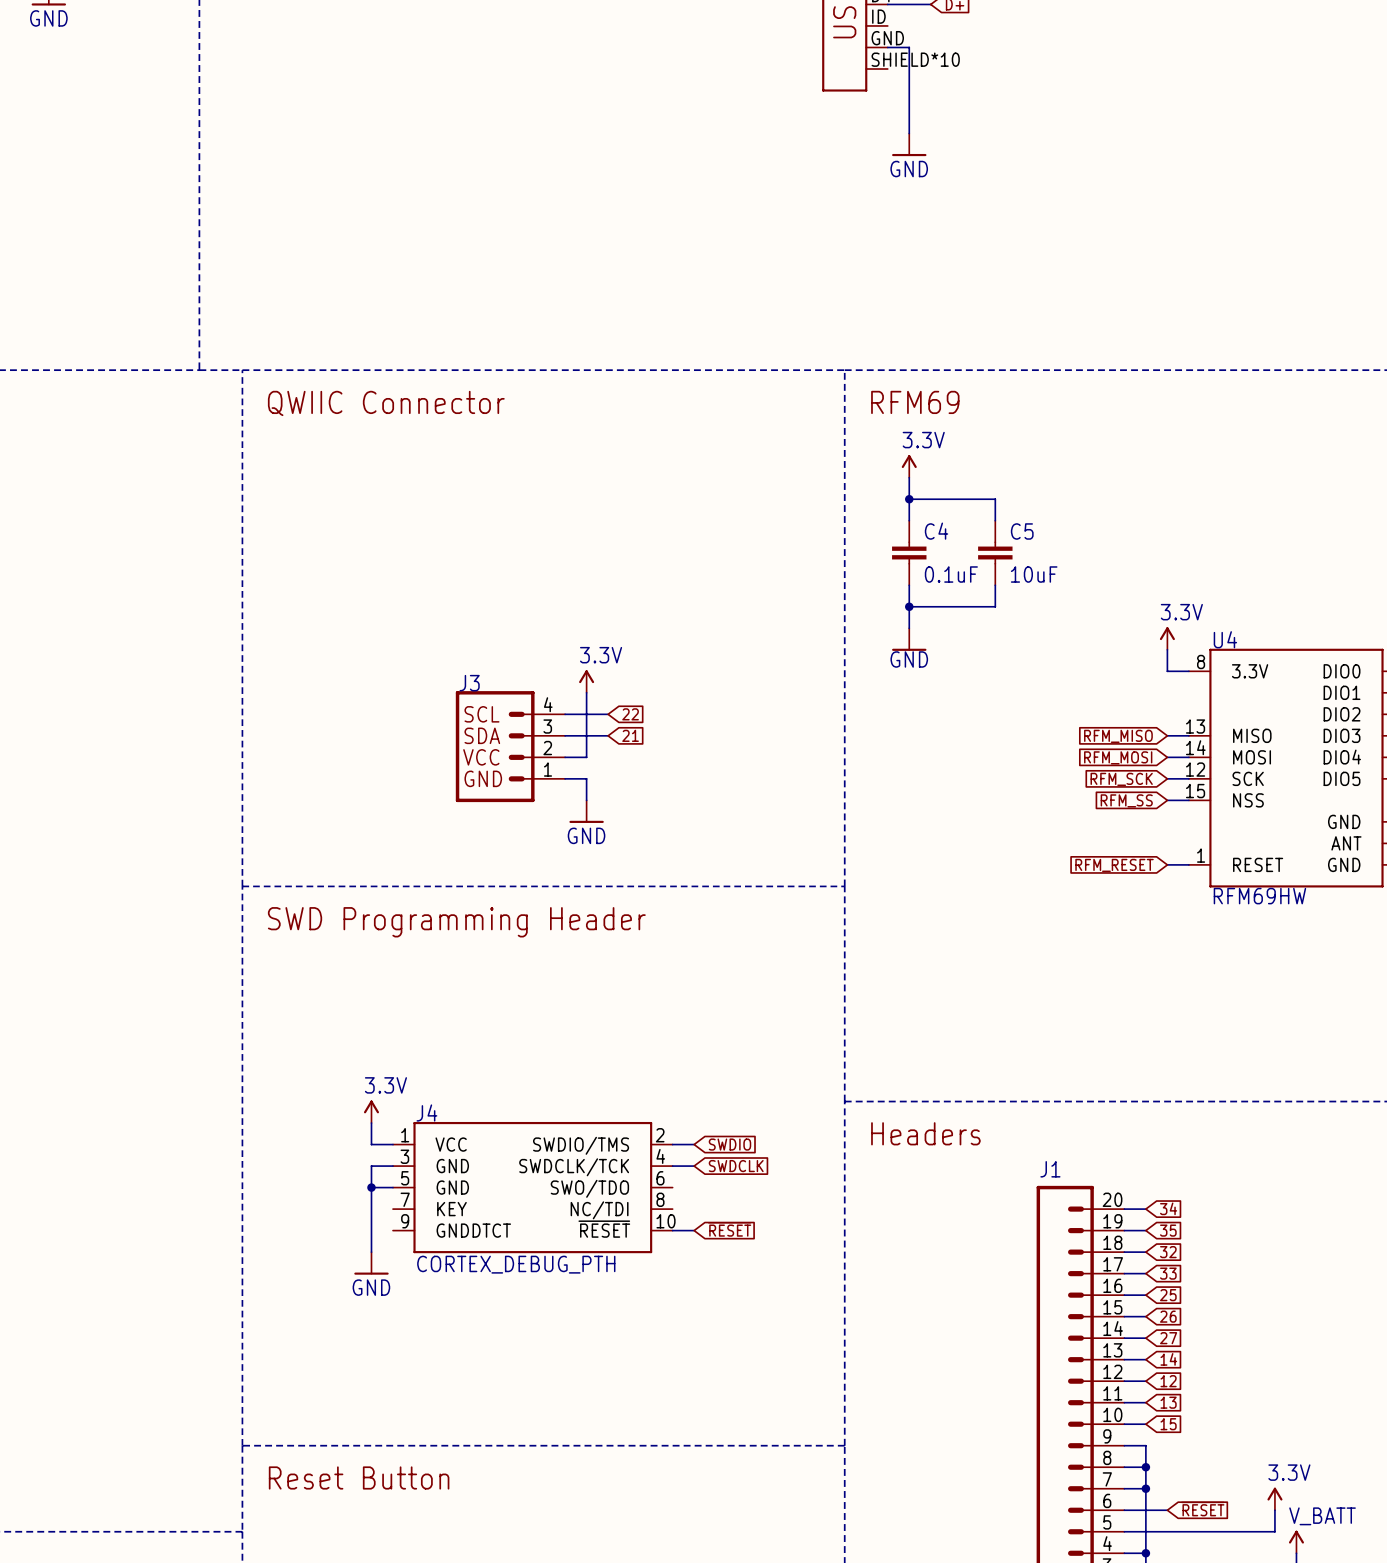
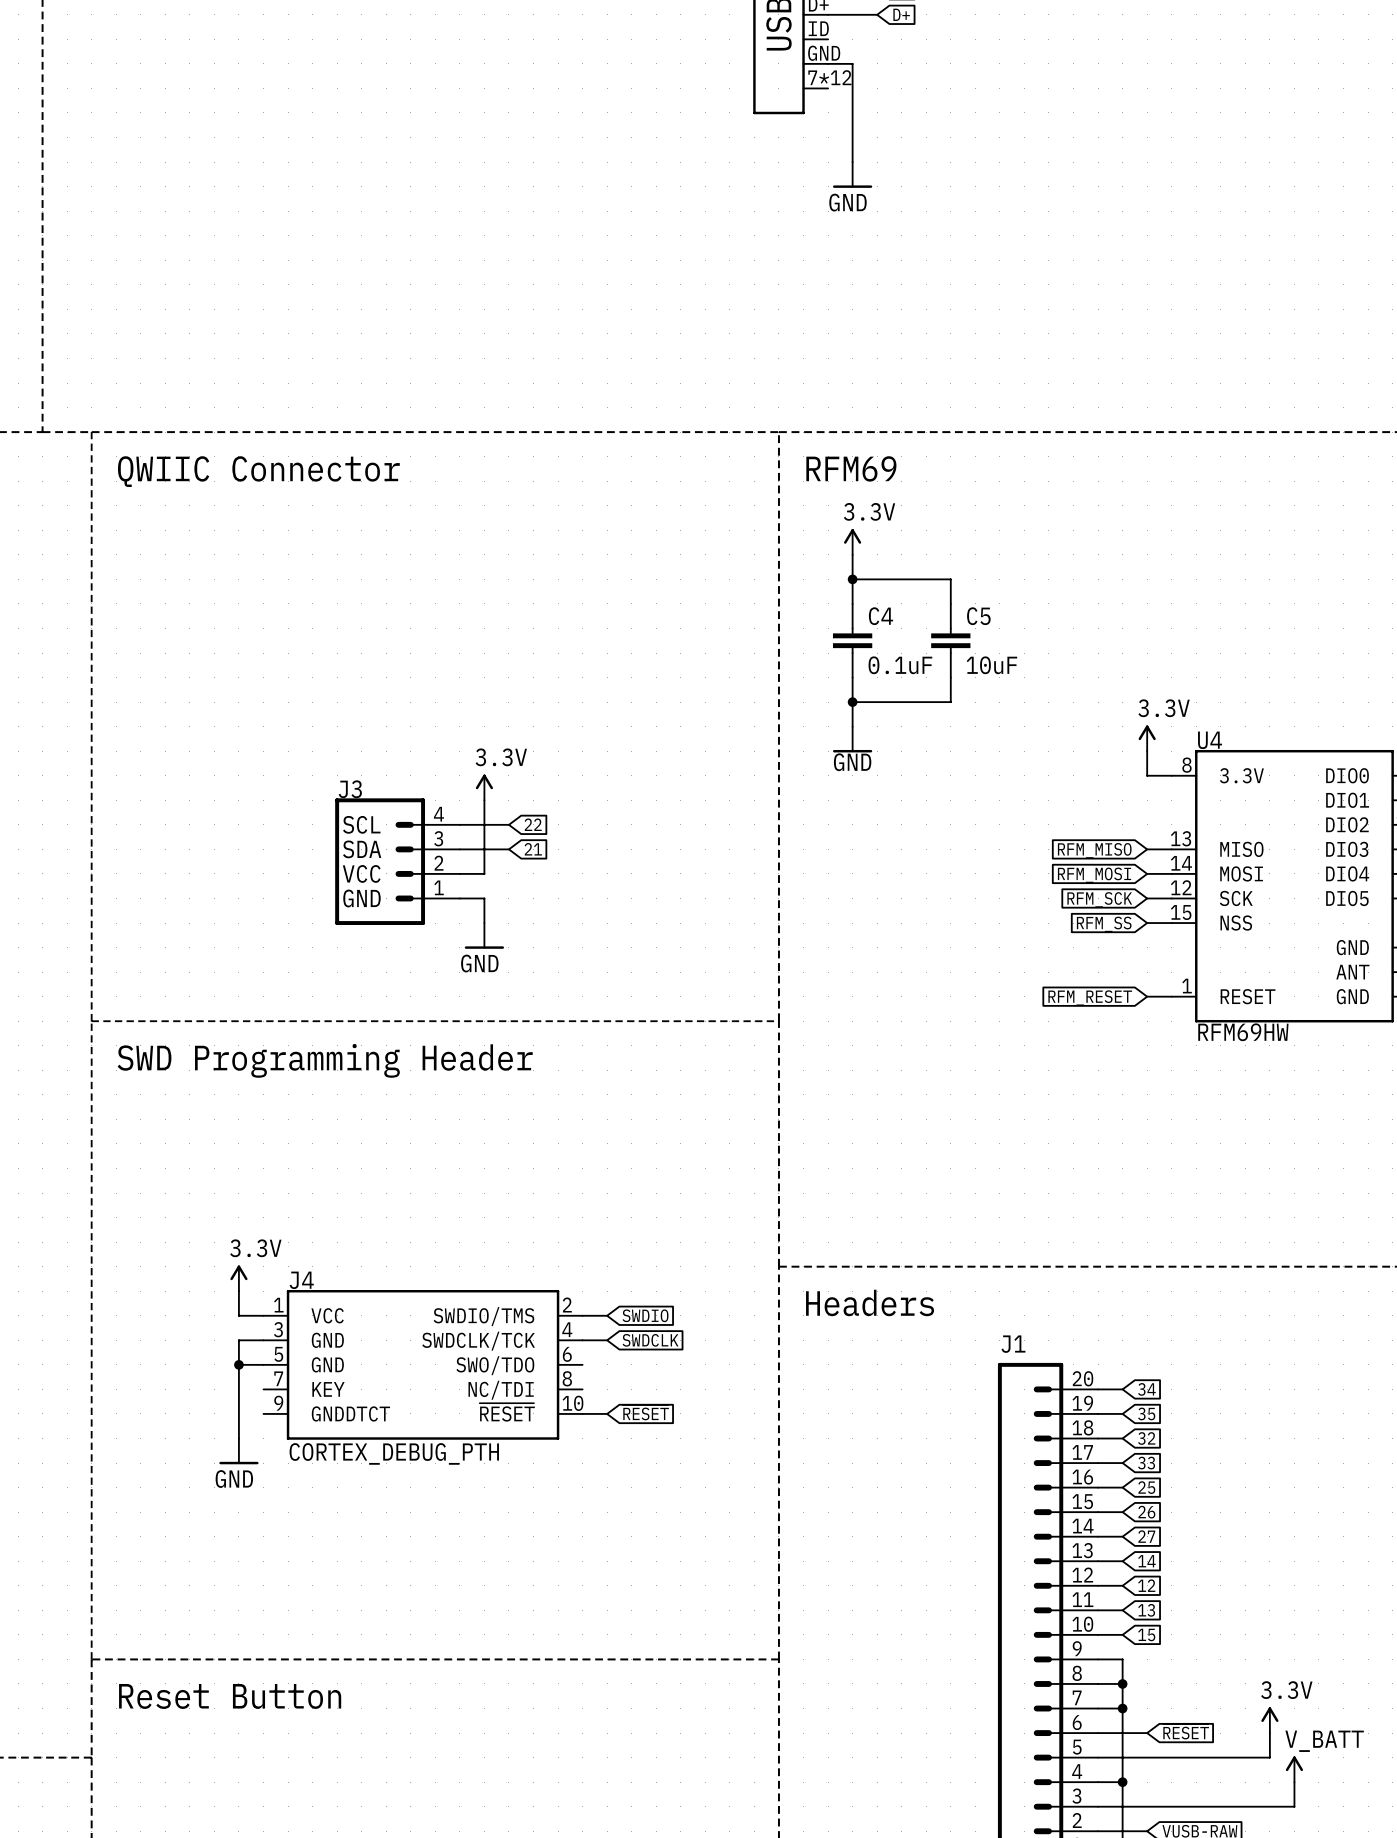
part pin number: SHIELD*10 (915, 59) -> 7*12 (829, 77)

